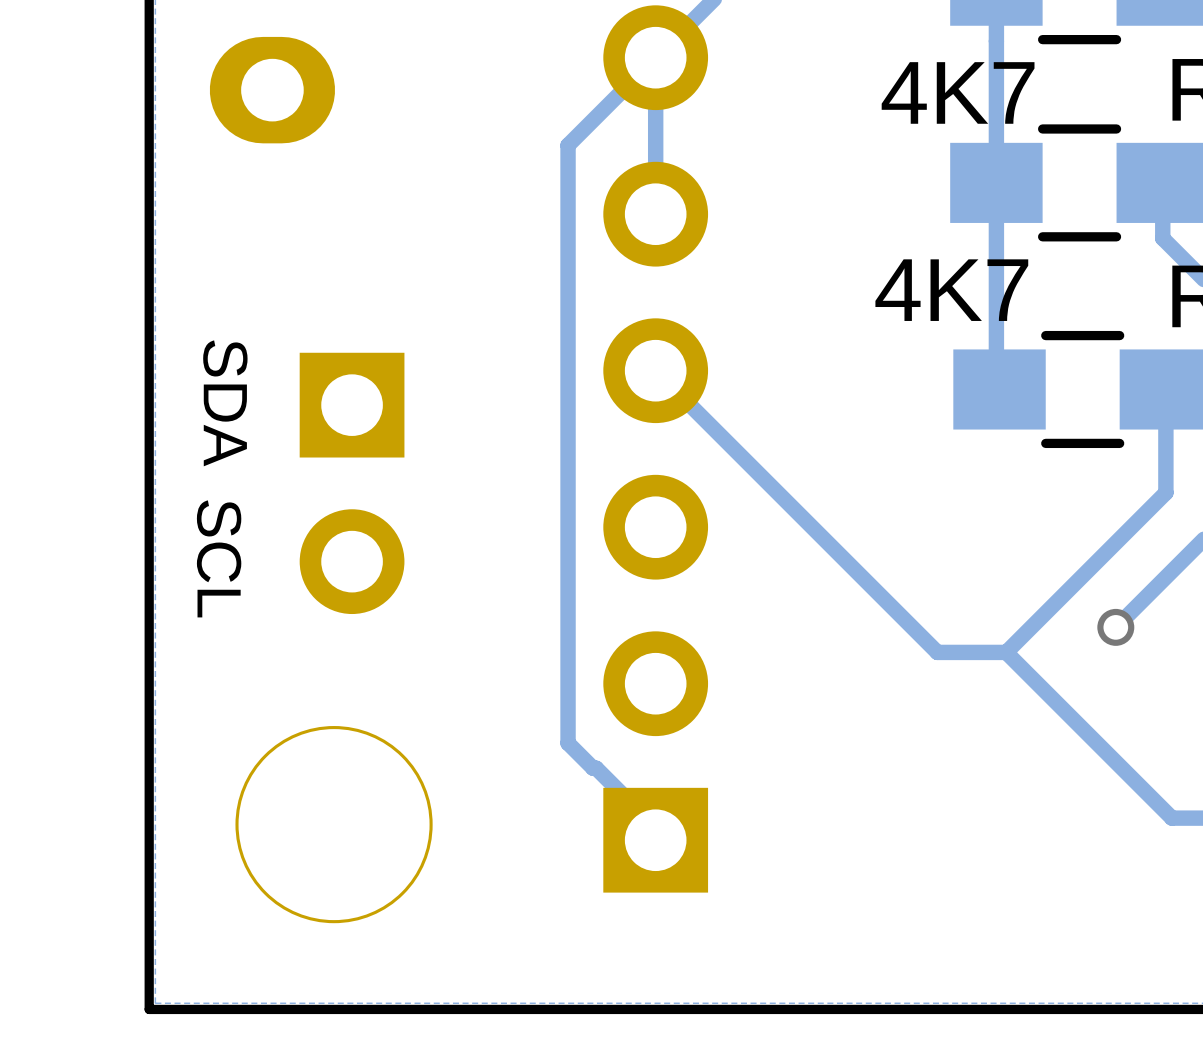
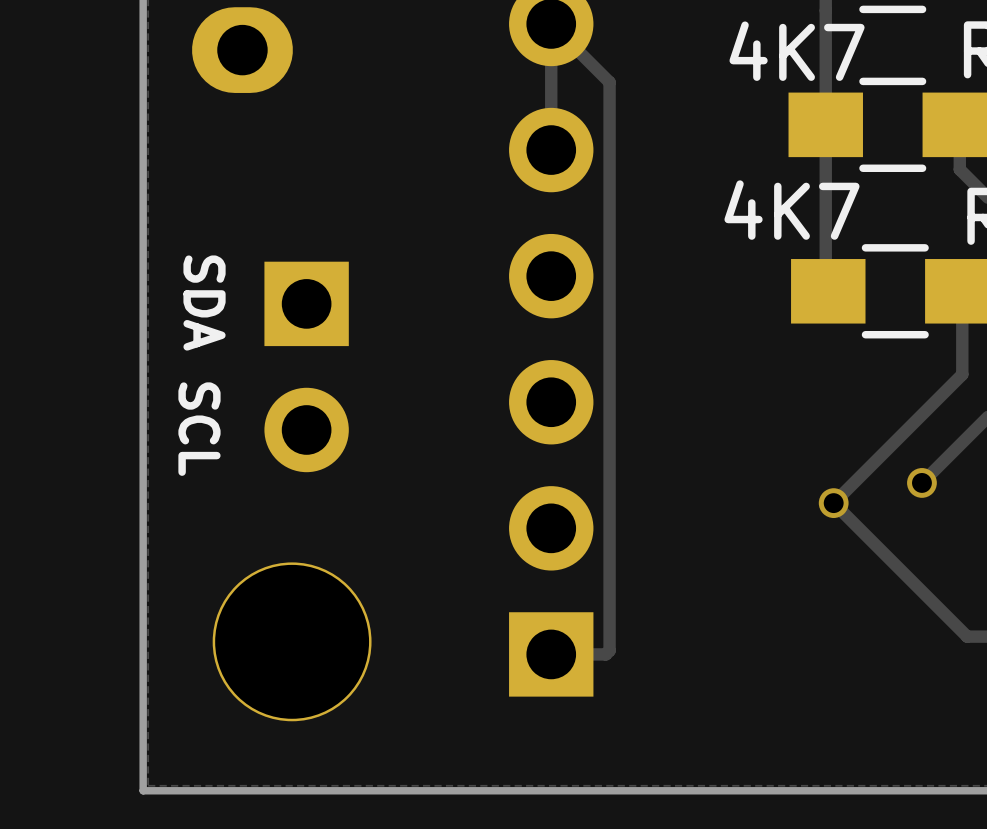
track: (655, 57) (568, 145) (568, 743) (593, 768) (596, 768) (655, 827) (655, 840) -> (551, 23) (609, 82) (609, 650) (605, 654) (551, 654)
track: (655, 370) (937, 652) (1006, 652) -> none
via: none -> (833, 503)

